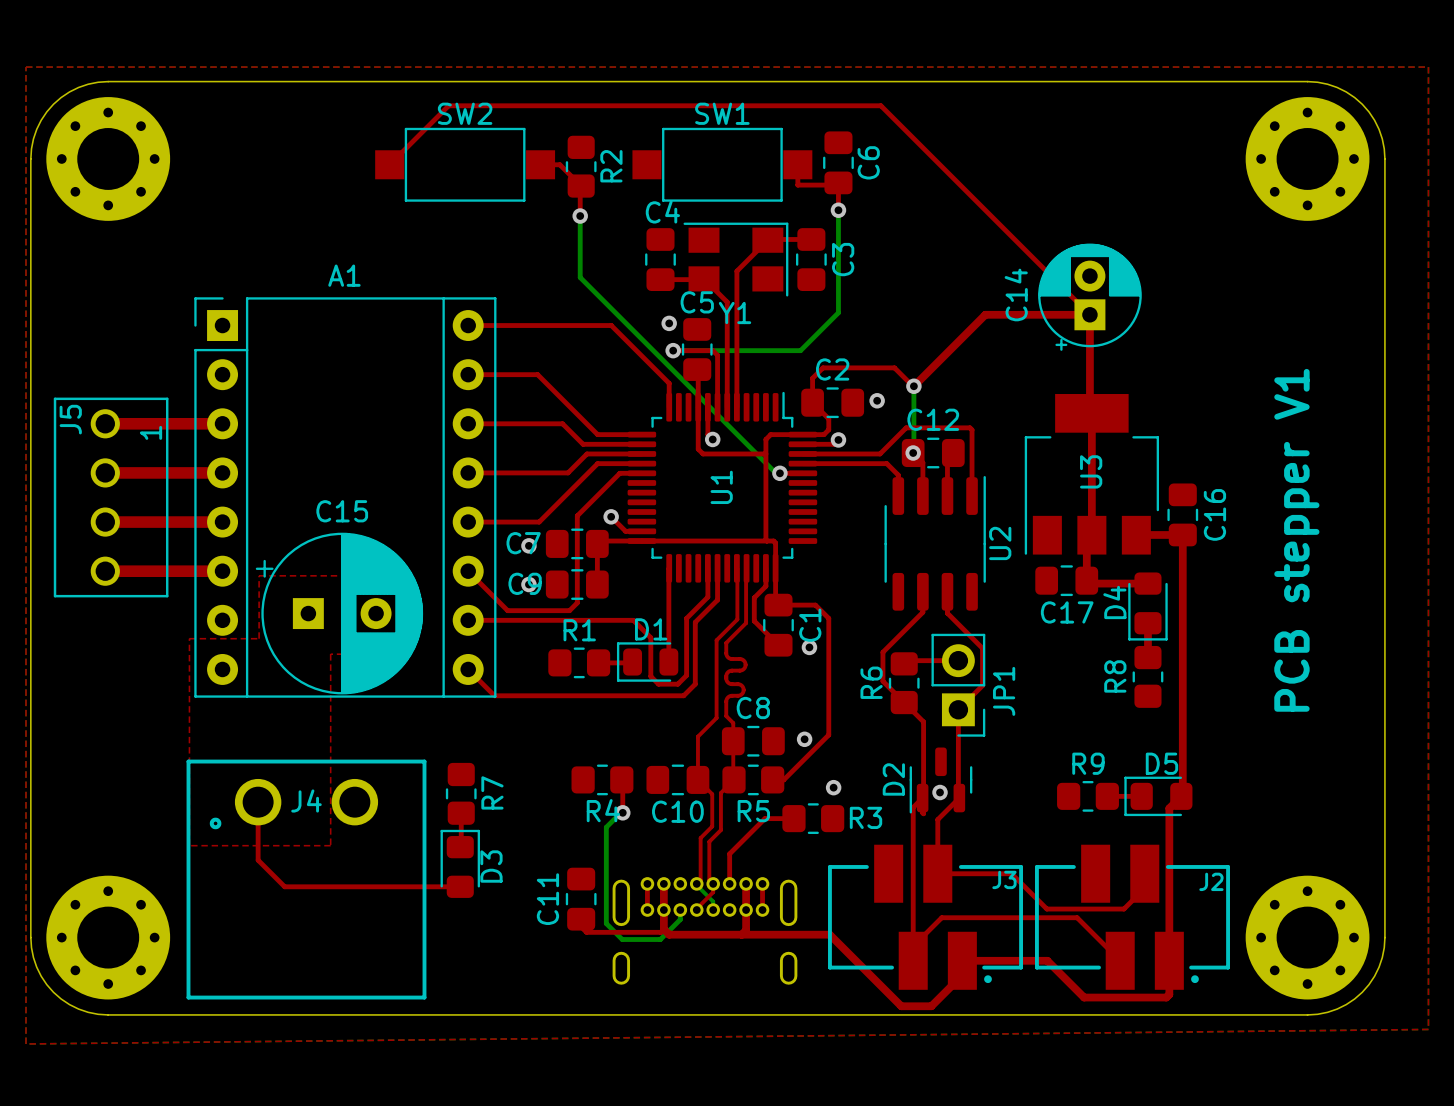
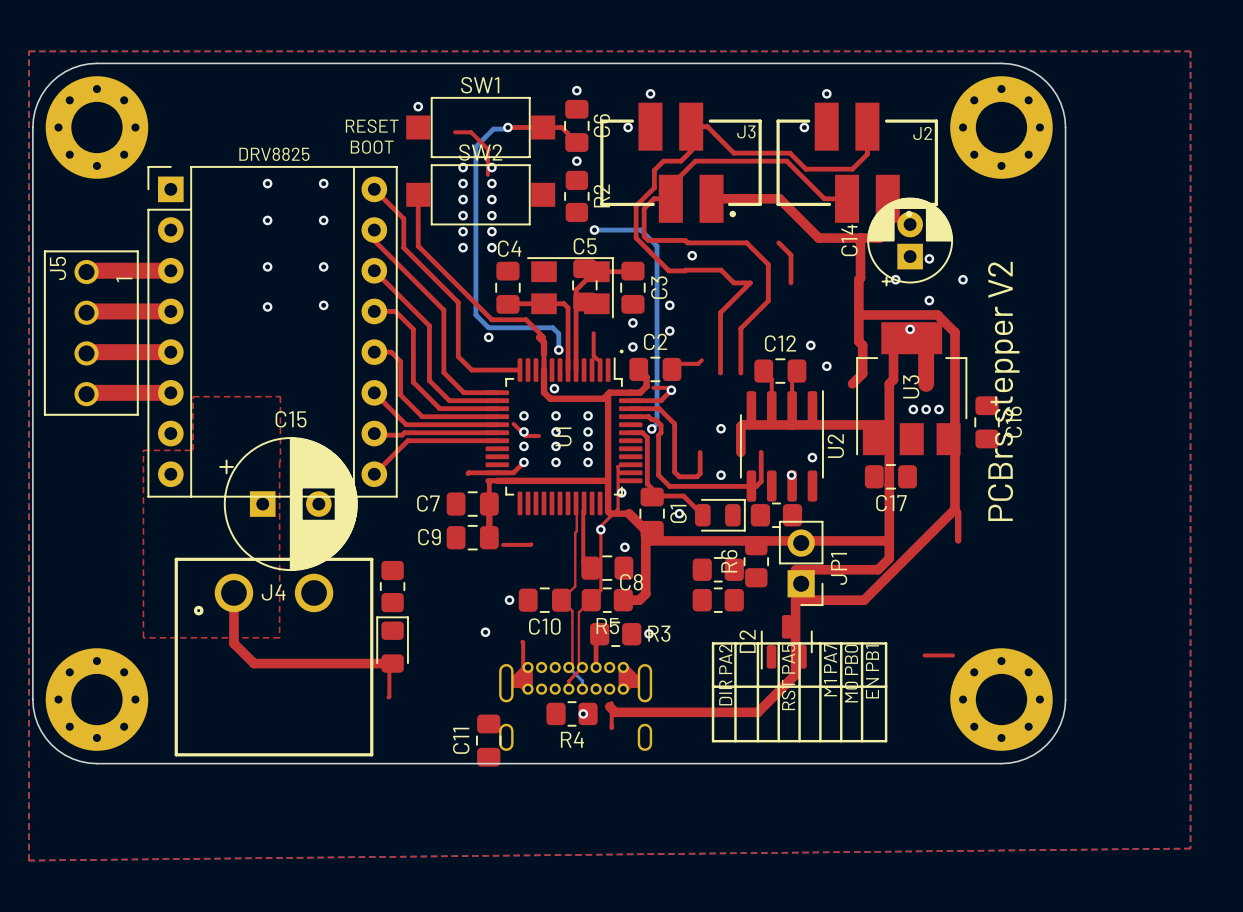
board edge: (1200, 81) (1307, 81) (1337, 87) (1354, 97) (1368, 111) (1379, 129) (1384, 148) (1384, 937) (1382, 957) (1374, 976) (1362, 992) (1346, 1004) (1327, 1012) (1307, 1014) (98, 1014) (78, 1009) (61, 998) (46, 984) (36, 967) (30, 937) (30, 849) -> (1001, 63) (1025, 68) (1046, 82) (1060, 102) (1065, 127) (1065, 699) (1063, 716) (1056, 731) (1046, 744) (1033, 755) (1018, 761) (1001, 763) (96, 763) (72, 758) (51, 744) (37, 724) (32, 699)
via: none -> (576, 90)
via: none -> (650, 93)
via: none -> (826, 93)
via: none -> (418, 106)
text: none -> RESET (372, 126)
top track: none -> (507, 127) (561, 127) (576, 142)
bottom track: none -> (507, 127) (493, 129) (475, 146) (475, 314) (488, 327) (552, 327) (558, 333) (558, 350)
via: none -> (507, 127)
via: none -> (628, 127)
via: none -> (804, 127)
top track: none -> (867, 126) (867, 154) (852, 169) (805, 169) (789, 153) (733, 153) (707, 126) (691, 126) (691, 150) (681, 161) (663, 161) (654, 170) (654, 187) (636, 206) (636, 238) (668, 270) (721, 270) (733, 282) (750, 282) (720, 312) (720, 373)
part position: (1307, 158) -> (1001, 127)
C6 position: (838, 162) -> (576, 125)
top track: (389, 164) (448, 105) (880, 105) (1089, 314) -> none
SW2 position: (465, 164) -> (480, 194)
SW1 position: (722, 164) -> (480, 127)
top track: (797, 164) (797, 185) (836, 185) (838, 182) (838, 210) -> none
R2 position: (581, 166) -> (576, 196)
text: none -> BOOT (372, 147)
text: none -> DRV8825 (274, 154)
via: none -> (576, 161)
via: none -> (463, 167)
via: none -> (491, 167)
bottom track: (838, 210) (838, 312) (800, 350) (673, 350) -> none
via: (838, 210) -> none
bottom track: (580, 216) (580, 277) (776, 473) (779, 473) -> none
via: (580, 216) -> none
via: none -> (267, 183)
via: none -> (323, 183)
via: none -> (463, 183)
via: none -> (491, 183)
top track: none -> (374, 189) (403, 218) (403, 247) (458, 302) (458, 356) (471, 370) (519, 370)
top track: (811, 239) (768, 239) (736, 271) (736, 407) -> none
top track: none -> (418, 194) (418, 246) (491, 319) (526, 319) (543, 337)
top track: none -> (711, 198) (779, 198) (818, 238) (879, 238) (887, 229) (887, 198)
top track: none -> (847, 198) (824, 198) (786, 161) (695, 161) (670, 185) (670, 198) (654, 198) (644, 208) (644, 236) (648, 240) (746, 242) (768, 264) (768, 300) (740, 328) (740, 373)
via: none -> (463, 199)
via: none -> (491, 199)
C4 position: (660, 259) -> (507, 287)
Y1: (735, 259) -> none
C3 position: (811, 259) -> (632, 287)
via: none -> (463, 215)
via: none -> (491, 215)
via: none -> (267, 220)
via: none -> (323, 220)
top track: (660, 279) (704, 278) (727, 302) (727, 407) -> none
top track: none -> (374, 230) (374, 240) (443, 310) (443, 372) (463, 392) (497, 392)
bottom track: none -> (594, 230) (640, 230) (657, 246) (657, 423) (651, 428)
via: none -> (594, 230)
via: none -> (463, 231)
via: none -> (491, 231)
top track: none -> (860, 238) (858, 341) (862, 345) (862, 373) (852, 383)
top track: none -> (778, 242) (791, 255) (791, 282)
via: none -> (463, 247)
via: none -> (491, 247)
via: none -> (692, 255)
top track: (1089, 314) (985, 314) (913, 386) -> none
top track: (1089, 314) (1091, 535) (1086, 540) (1086, 580) (1089, 583) (1147, 583) -> none
via: none -> (929, 258)
via: (669, 323) -> none
top track: (468, 325) (611, 325) (669, 383) (669, 407) -> none
via: none -> (267, 266)
via: none -> (323, 266)
top track: none -> (170, 270) (86, 272)
top track: none -> (374, 270) (429, 325) (429, 380) (449, 400) (497, 400)
top track: none -> (632, 271) (594, 271) (576, 290) (576, 370)
via: none -> (895, 279)
via: none -> (963, 279)
top track: (673, 350) (712, 350) (717, 355) (717, 407) -> none
via: (673, 350) -> none
part: none -> (570, 287)
via: none -> (929, 300)
top track: none -> (507, 304) (564, 303) (568, 307) (568, 370)
top track: (694, 372) (698, 370) (698, 449) (703, 453) (765, 453) -> none
via: none -> (323, 305)
via: none -> (669, 305)
top track: (468, 374) (537, 374) (597, 434) (641, 434) -> none
via: none -> (267, 306)
top track: none -> (170, 311) (86, 312)
top track: none -> (374, 311) (395, 311) (413, 329) (413, 382) (439, 408) (497, 408)
top track: none -> (858, 314) (937, 314) (955, 332) (955, 509) (864, 600) (795, 600) (795, 674) (757, 712) (615, 712) (609, 706)
top track: (913, 386) (894, 367) (822, 367) (812, 378) (812, 402) (828, 418) (828, 429) (823, 434) (770, 434) (765, 439) (766, 541) -> none
bottom track: (913, 386) (913, 453) -> none
via: (913, 386) -> none
via: none -> (632, 322)
via: (877, 400) -> none
C2 position: (832, 402) -> (655, 369)
via: none -> (910, 329)
via: none -> (669, 331)
part: none -> (272, 331)
via: none -> (488, 337)
top track: none -> (539, 337) (544, 342) (544, 392) (550, 398) (603, 398) (609, 392) (640, 392) (646, 386) (646, 377) (638, 369)
via: none -> (810, 345)
top track: (105, 423) (222, 423) -> none
top track: (468, 423) (562, 423) (583, 444) (641, 444) -> none
via: none -> (632, 347)
top track: none -> (893, 346) (893, 379) (889, 383) (889, 558) (878, 569) (795, 569)
top track: none -> (926, 346) (926, 383)
via: none -> (558, 350)
top track: none -> (170, 352) (86, 353)
top track: none -> (374, 352) (391, 352) (400, 361) (400, 395) (422, 416) (497, 416)
text: none -> . (621, 351)
via: (712, 439) -> none
via: (838, 439) -> none
via: none -> (826, 366)
top track: (641, 453) (586, 453) (568, 472) (468, 472) -> none
top track: (802, 453) (880, 453) (906, 427) (970, 427) (972, 429) (972, 496) -> none
via: (913, 453) -> none
top track: (641, 463) (597, 463) (539, 522) (468, 522) -> none
top track: (802, 463) (886, 463) (898, 475) (898, 496) -> none
top track: (105, 472) (222, 472) -> none
top track: (641, 473) (619, 473) (577, 515) (577, 602) (569, 610) (507, 610) (468, 571) -> none
via: (779, 473) -> none
via: none -> (554, 388)
top track: none -> (671, 390) (660, 400) (630, 400)
via: none -> (671, 390)
text: none -> PCBrs stepper V2 (1003, 391)
top track: none -> (170, 392) (86, 394)
top track: none -> (374, 392) (406, 424) (497, 424)
top track: none -> (608, 394) (608, 511) (610, 513) (629, 513) (645, 530) (645, 593) (639, 600) (623, 600)
top zone outline: none -> (193, 396) (193, 450) (143, 450) (143, 637) (279, 637) (280, 396) (193, 396)
U1 position: (722, 487) -> (564, 436)
J5 position: (111, 497) -> (91, 333)
A1: (345, 497) -> none
top track: none -> (630, 408) (659, 408) (674, 423) (674, 472) (679, 476) (697, 476) (700, 473) (700, 452)
via: none -> (913, 409)
via: none -> (926, 409)
via: none -> (938, 409)
via: none -> (523, 415)
via: none -> (556, 415)
via: none -> (588, 415)
top track: none -> (630, 416) (648, 416) (661, 425) (661, 432) (658, 435) (658, 475) (669, 486) (756, 486) (761, 481) (761, 452)
via: (611, 516) -> none
top track: (105, 522) (222, 522) -> none
via: none -> (651, 428)
via: none -> (721, 428)
top track: none -> (889, 428) (885, 424) (742, 424) (740, 426) (740, 452)
via: none -> (523, 431)
via: none -> (556, 431)
via: none -> (588, 431)
top track: none -> (497, 432) (404, 432) (402, 435) (375, 435) (374, 433)
top track: none -> (630, 432) (642, 432) (647, 437) (647, 483) (659, 496) (683, 496) (702, 515)
top track: (1136, 534) (1182, 534) (1182, 794) (1169, 808) (1169, 994) (1166, 997) (1084, 997) (1047, 960) (962, 960) (962, 975) (931, 1006) (901, 1006) (829, 934) (669, 934) (663, 929) -> none
top track: none -> (497, 440) (407, 440) (374, 474)
text: PCB stepper V1 (1296, 540) -> none
C7 position: (577, 543) -> (472, 504)
via: none -> (523, 446)
via: none -> (556, 446)
via: none -> (588, 446)
via: (528, 545) -> none
via: none -> (812, 457)
top track: none -> (523, 462) (513, 472) (467, 473)
via: none -> (523, 462)
via: none -> (556, 462)
via: none -> (588, 462)
top track: (669, 568) (668, 662) -> none
top track: (707, 568) (707, 597) (686, 618) (686, 675) (677, 684) (658, 684) (650, 676) (650, 637) (633, 620) (468, 620) -> none
top track: (717, 568) (717, 600) (695, 622) -> none
top track: (746, 568) (746, 623) (726, 642) (727, 657) (742, 659) (745, 664) (742, 669) (729, 671) (726, 675) (728, 682) (740, 684) (743, 689) (741, 694) (729, 696) (726, 700) (726, 716) (733, 723) (734, 779) (720, 792) (720, 830) (709, 841) (709, 880) (713, 883) (713, 892) (696, 910) -> none
top track: (765, 568) (765, 586) (754, 597) (754, 621) (778, 645) -> none
top track: (105, 571) (222, 571) -> none
top zone outline: (259, 575) (259, 638) (189, 638) (189, 845) (330, 845) (330, 654) (343, 654) (343, 575) (259, 575) -> none
via: none -> (721, 475)
via: none -> (791, 475)
via: (528, 584) -> none
C9 position: (577, 584) -> (472, 537)
top track: (597, 584) (597, 543) (600, 541) (773, 541) (775, 542) (775, 602) (778, 605) (815, 605) (828, 618) (828, 734) (783, 779) (772, 779) -> none
top track: none -> (608, 480) (489, 480) (489, 537)
top track: (922, 591) (922, 612) (882, 652) (882, 681) (923, 721) (923, 813) (922, 798) (913, 807) (913, 960) -> none
top track: (947, 591) (947, 613) (982, 648) (982, 685) (958, 709) (959, 798) (937, 819) (937, 873) (1011, 873) (1046, 909) (1123, 909) (1144, 888) (1144, 873) -> none
via: none -> (621, 492)
D4: (1147, 606) -> none
top track: none -> (576, 503) (575, 586) (561, 600) (572, 611) (572, 663) (568, 667)
via: none -> (679, 513)
part: none -> (720, 515)
part: none -> (776, 515)
via: none -> (600, 529)
via: (809, 647) -> none
top track: none -> (645, 540) (887, 540) (889, 542)
R1: (579, 662) -> none
D1: (647, 662) -> none
via: none -> (624, 547)
top track: (468, 669) (494, 695) (683, 695) (695, 684) -> none
R8: (1147, 676) -> none
part: none -> (718, 569)
part: none -> (392, 586)
top track: none -> (233, 592) (233, 643) (254, 663) (392, 663)
via: none -> (509, 600)
part: none -> (718, 600)
top track: (697, 736) (697, 779) (712, 794) (712, 826) (700, 838) (700, 880) (696, 883) -> (585, 605) (578, 612) (578, 663) (582, 667) (568, 681) (568, 689)
via: (804, 739) -> none
C8 position: (753, 741) -> (607, 568)
via: none -> (485, 632)
top track: none -> (599, 634) (596, 637) (596, 667)
via: none -> (648, 633)
R4 position: (602, 779) -> (572, 713)
C10 position: (677, 779) -> (544, 600)
R5 position: (753, 779) -> (607, 600)
line: none -> (713, 643) (713, 741) (886, 741) (886, 643) (713, 643)
line: none -> (735, 643) (735, 741)
line: none -> (757, 643) (757, 741)
line: none -> (778, 643) (778, 741)
line: none -> (799, 643) (799, 741)
line: none -> (820, 643) (820, 741)
line: none -> (841, 643) (841, 741)
line: none -> (862, 643) (862, 741)
part: none -> (392, 644)
via: (833, 787) -> none
via: (940, 792) -> none
R7: (461, 793) -> none
R9: (1088, 796) -> none
D5: (1158, 796) -> none
top track: (258, 802) (258, 860) (284, 886) (460, 886) -> none
bottom track: none -> (568, 667) (582, 681) (582, 689)
bottom track: (622, 812) (606, 827) (606, 923) (622, 939) (660, 939) (680, 919) (680, 910) -> none
via: (622, 812) -> none
top track: (793, 818) (764, 818) (729, 853) -> none
R3 position: (813, 818) -> (615, 634)
text: none -> M1 PA7 (830, 670)
text: none -> EN PB1 (872, 671)
top track: none -> (506, 683) (522, 683) (527, 689) (527, 667) (512, 683)
top track: none -> (639, 683) (623, 667) (623, 689) (629, 683) (644, 683)
text: none -> M0 PB0 (851, 673)
text: none -> DIR PA2 (725, 674)
text: none -> RST PA5 (788, 677)
line: none -> (713, 686) (886, 686)
D3: (460, 863) -> none
via: none -> (583, 713)
J4 position: (306, 879) -> (274, 657)
top track: (647, 883) (647, 910) -> none
top track: (663, 883) (663, 929) -> none
bottom track: (696, 883) (713, 901) (713, 910) -> none
top track: (746, 883) (746, 930) (741, 934) -> none
top track: (762, 883) (762, 910) -> none
J3 position: (925, 917) -> (681, 162)
J2 position: (1132, 917) -> (857, 162)
top track: (581, 919) (581, 926) (586, 932) (660, 932) (663, 929) -> none
part position: (704, 930) -> (575, 706)
part position: (108, 937) -> (96, 699)
part position: (1307, 937) -> (1001, 699)
top track: (913, 946) (941, 917) (1077, 917) (1120, 960) -> none

